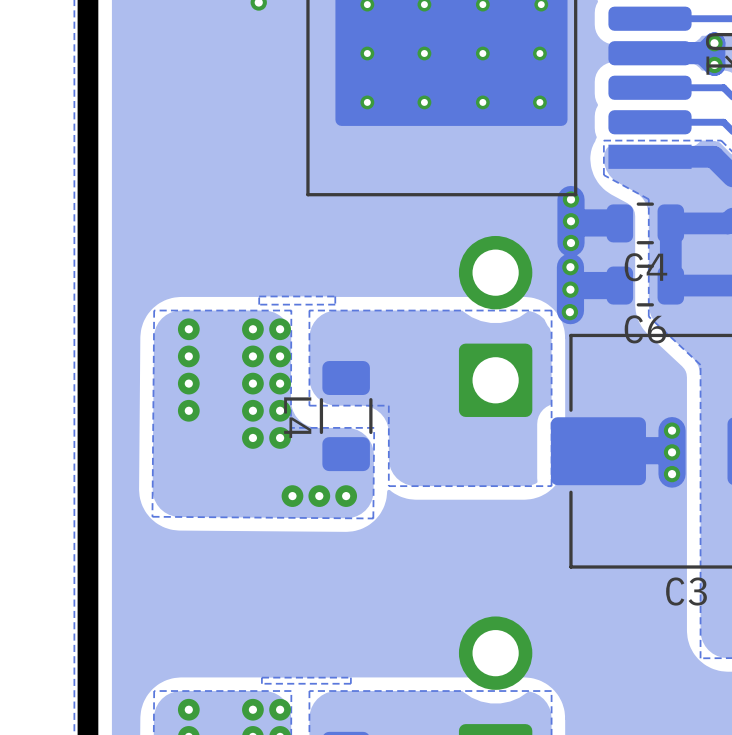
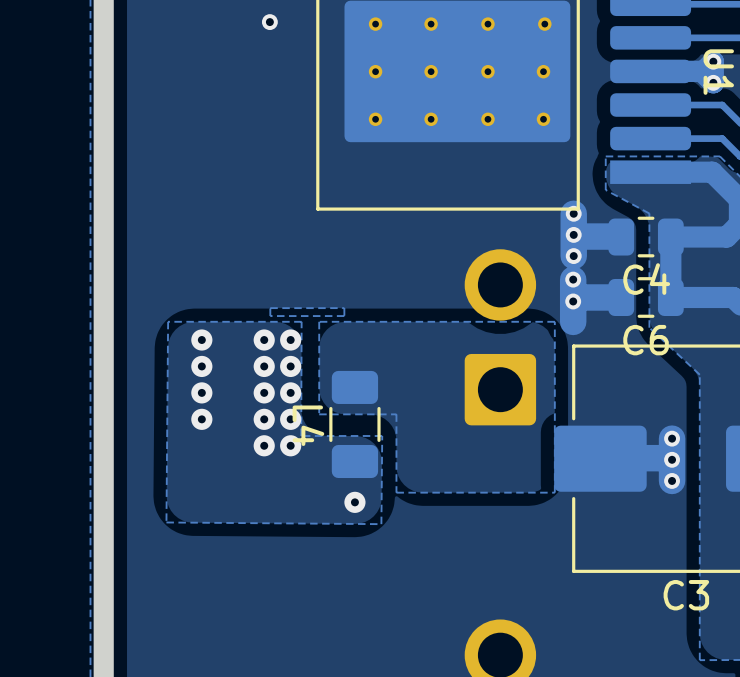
via: (569, 312) -> none
via: (292, 496) -> none
via: (319, 496) -> none

